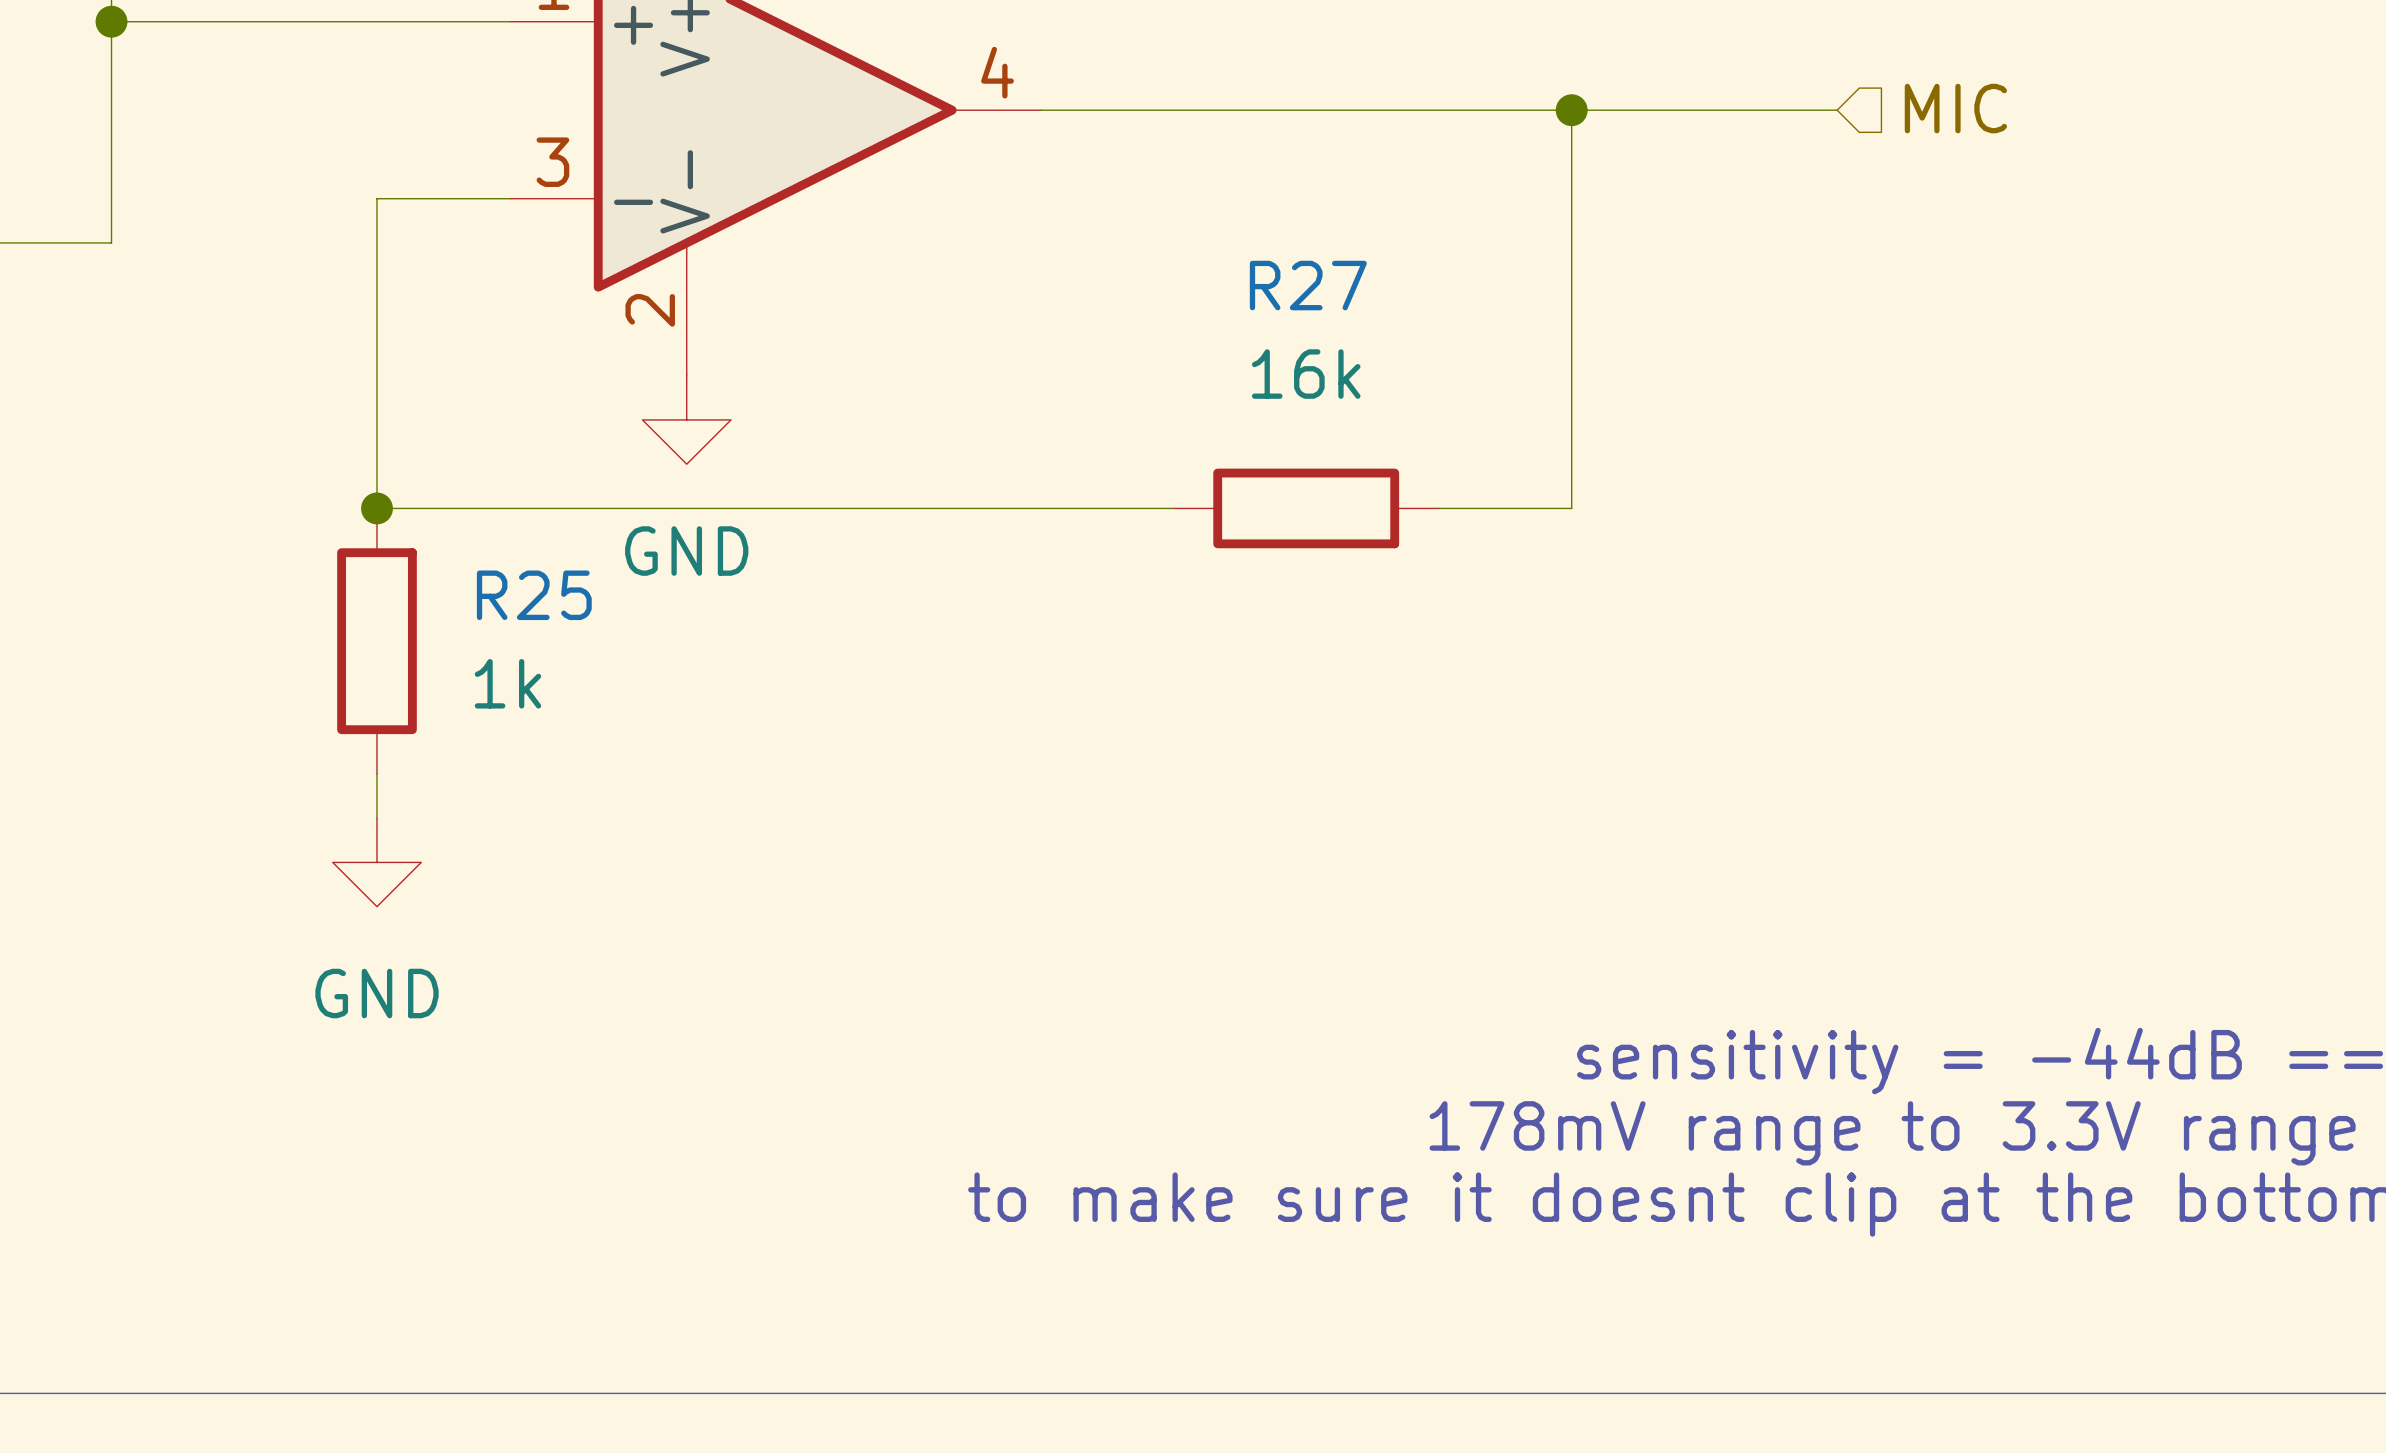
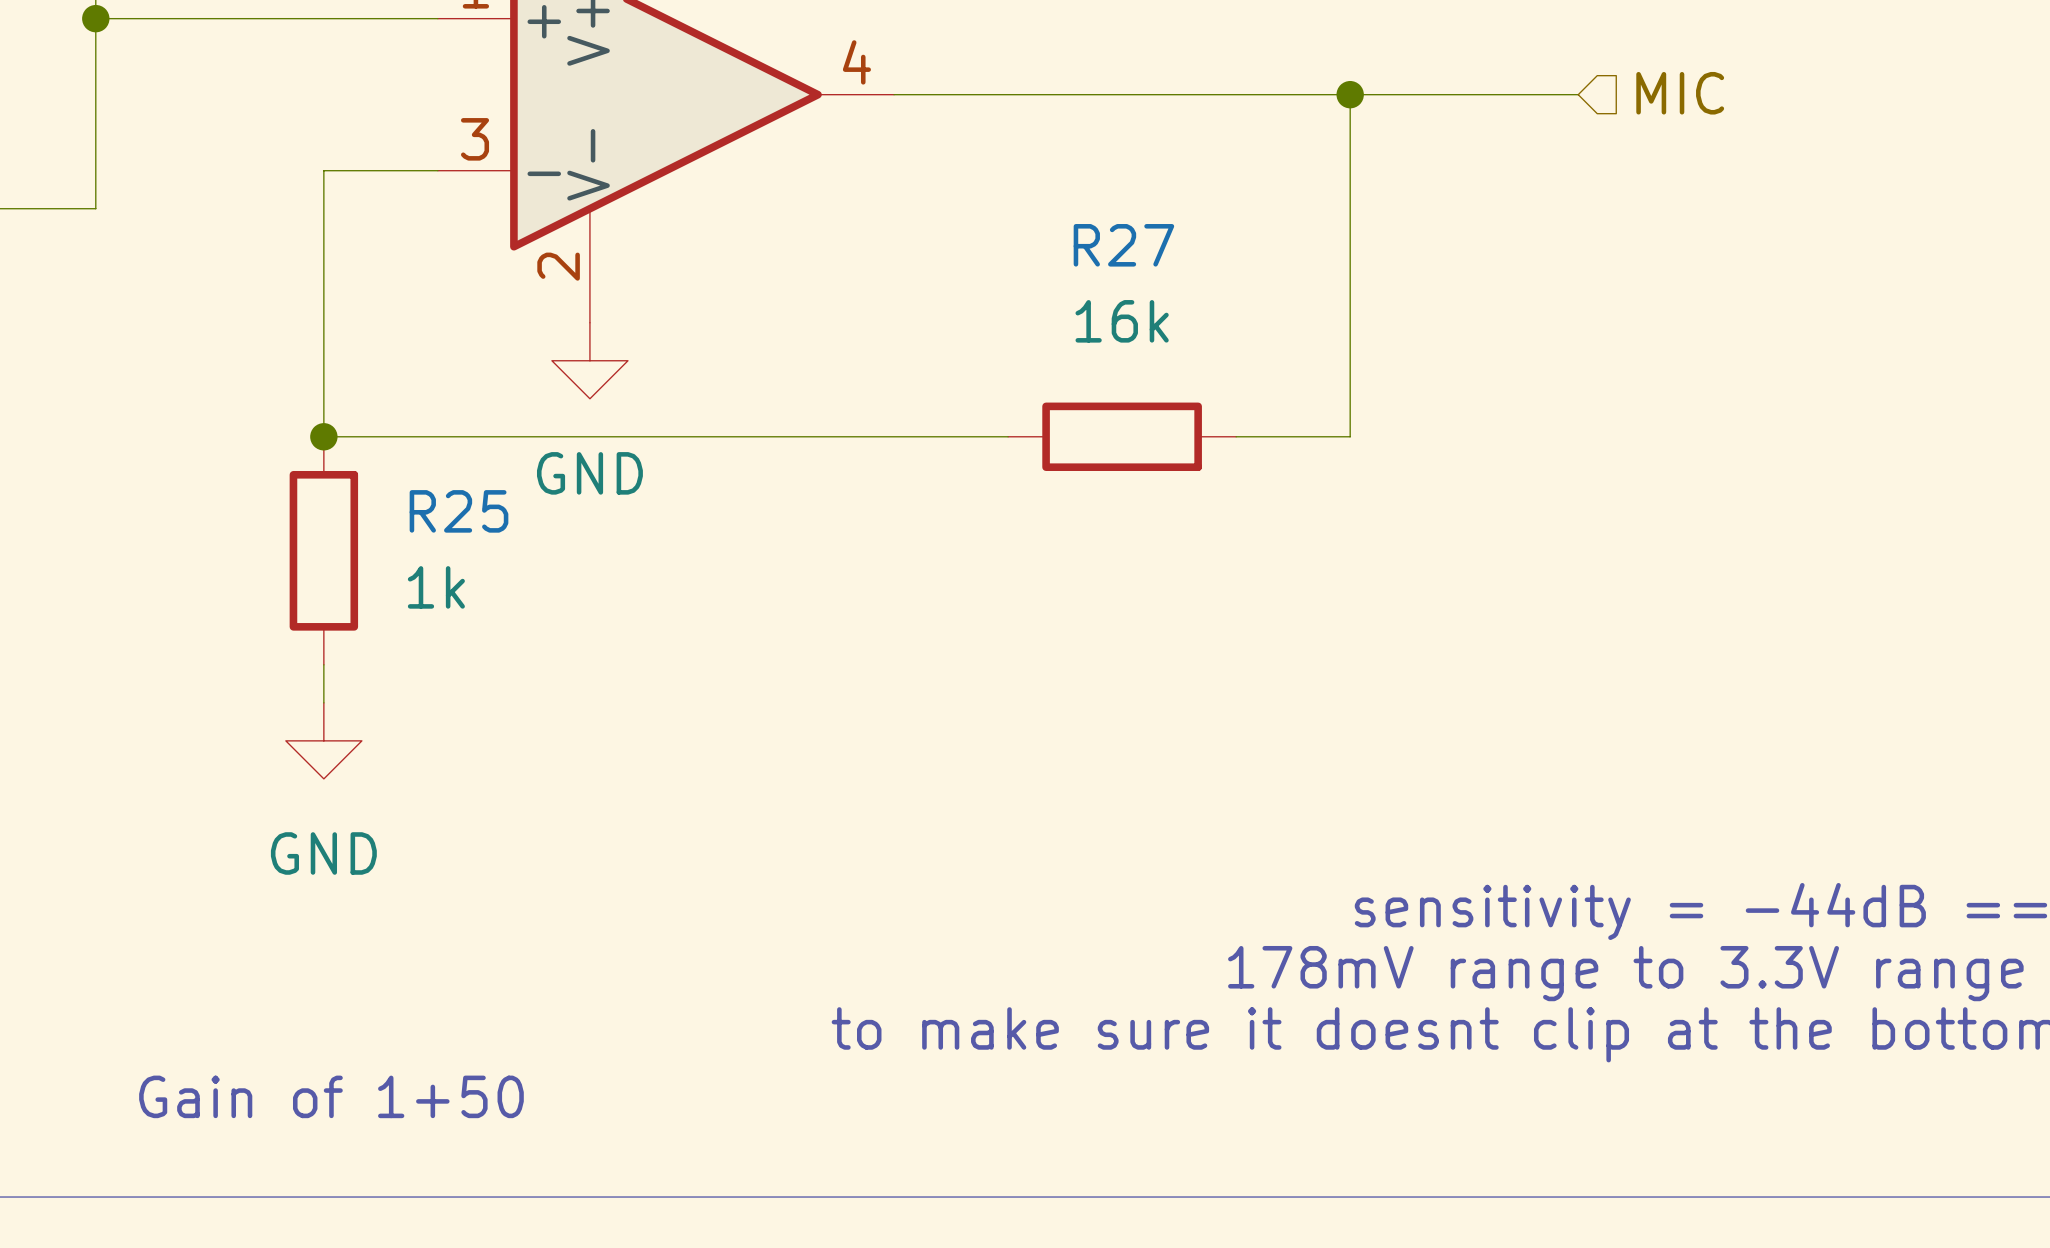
text: none -> Gain of 1+50 (331, 1096)

